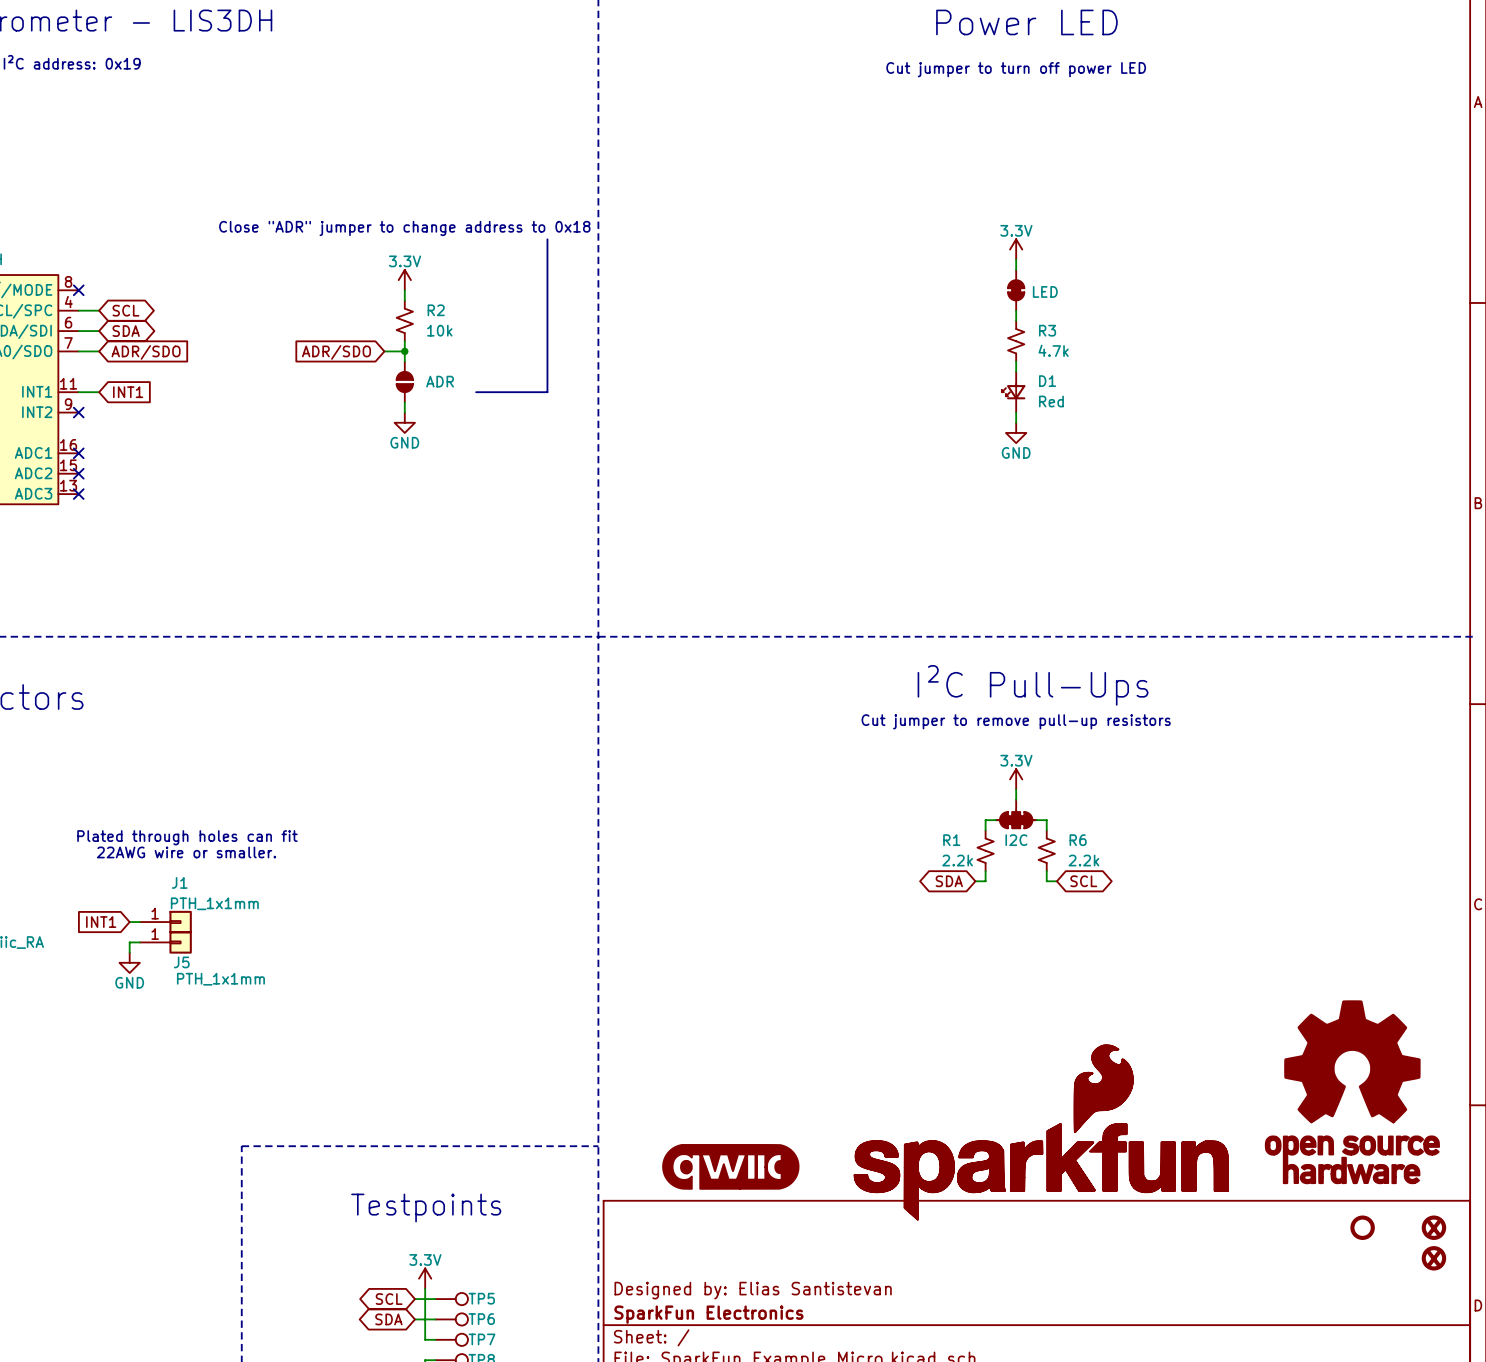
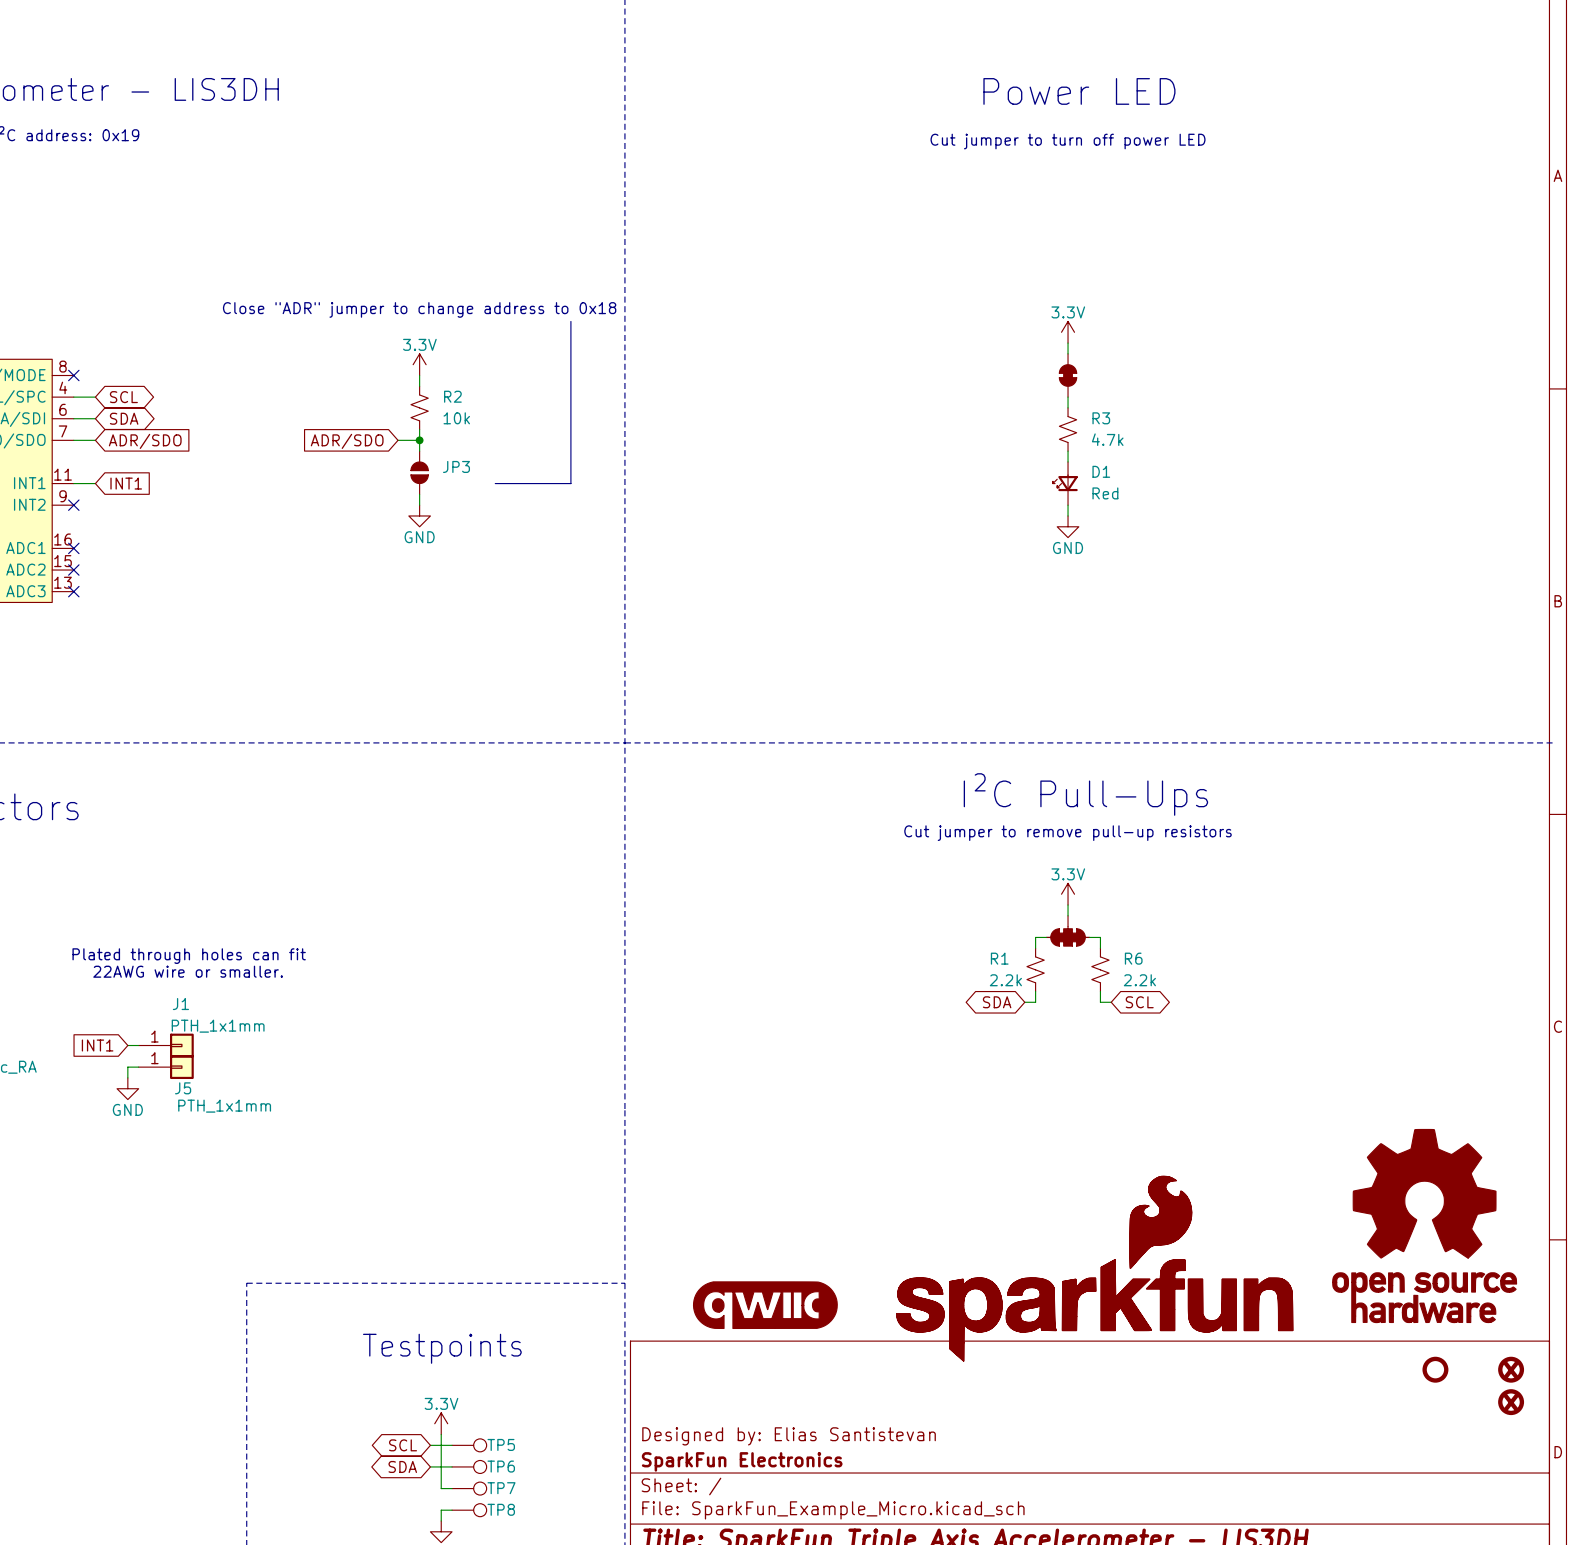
part value: LED (1045, 291) -> none
JP3 name: none -> JP3 (456, 466)
JP3 value: ADR (440, 381) -> none
part value: I2C (1016, 840) -> none

